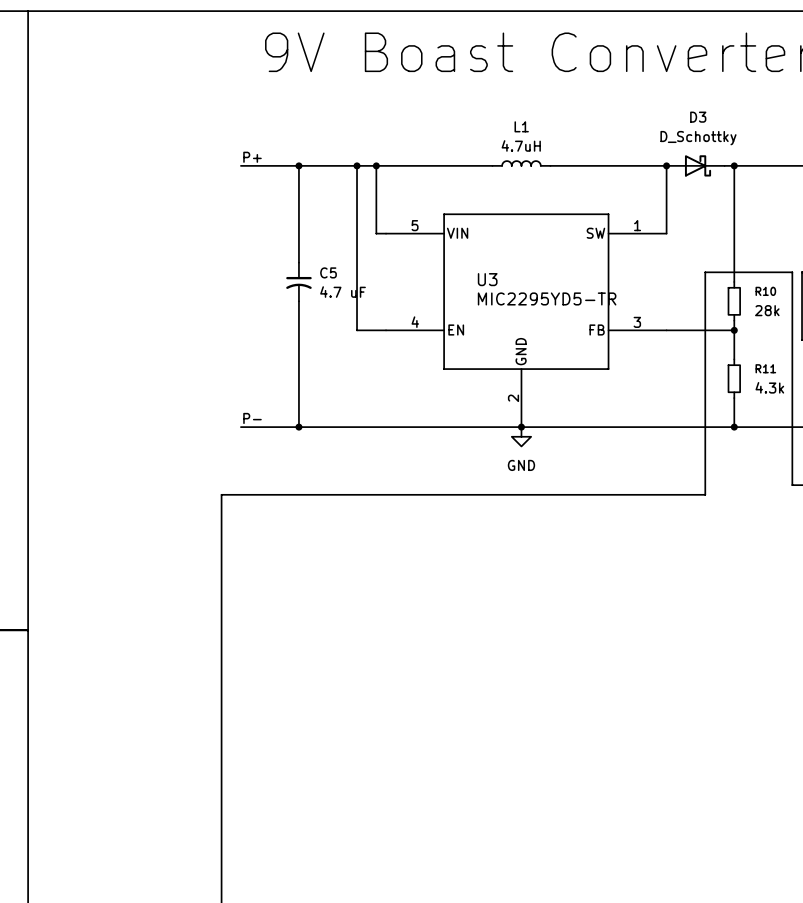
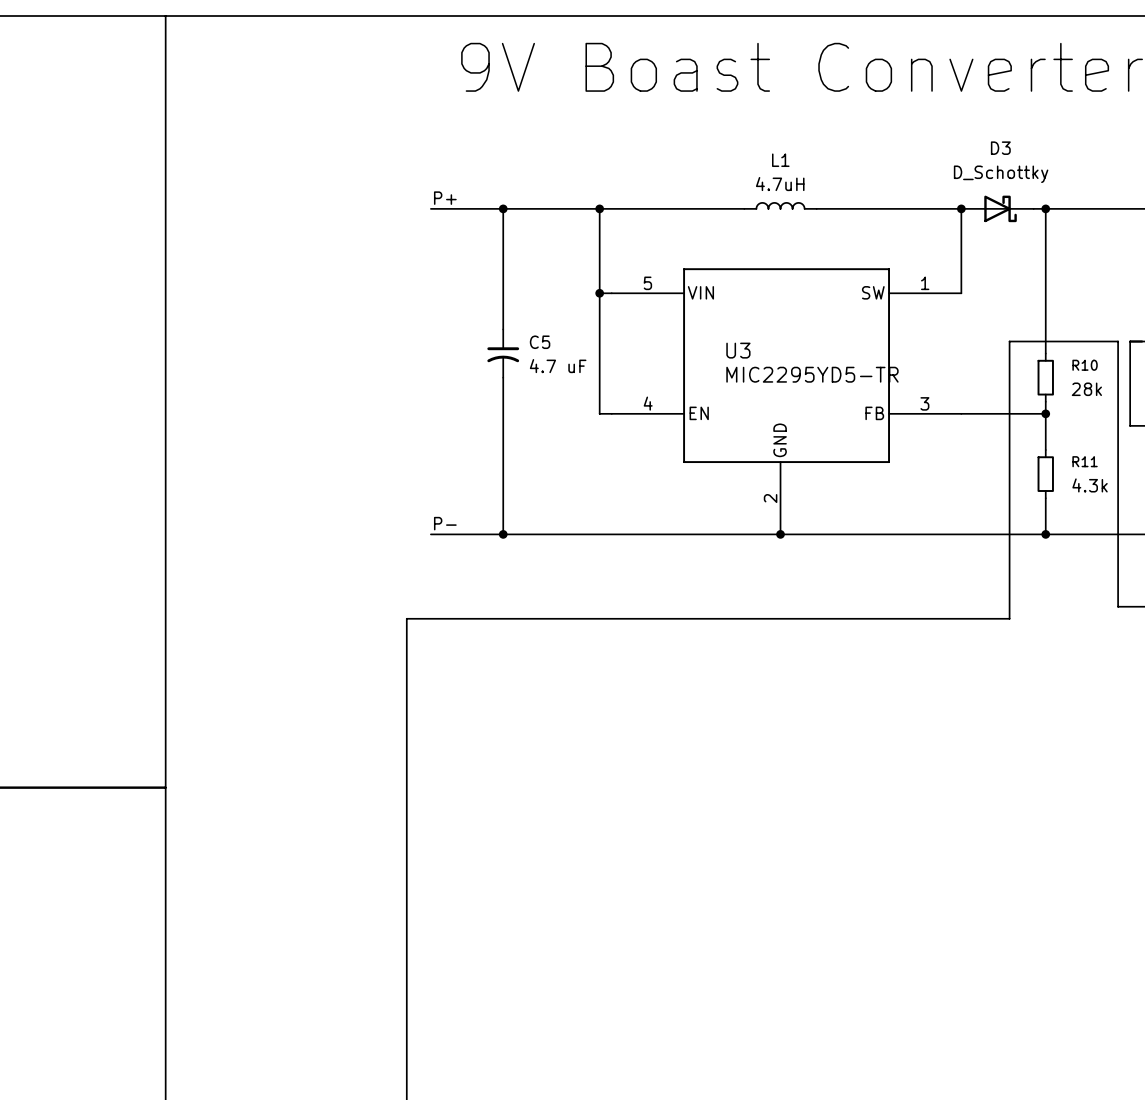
wire: (357, 165) (357, 330) (376, 330) -> (599, 293) (599, 413)
junction: (357, 165) -> none
junction: none -> (599, 293)
power symbol: GND (521, 436) -> none

